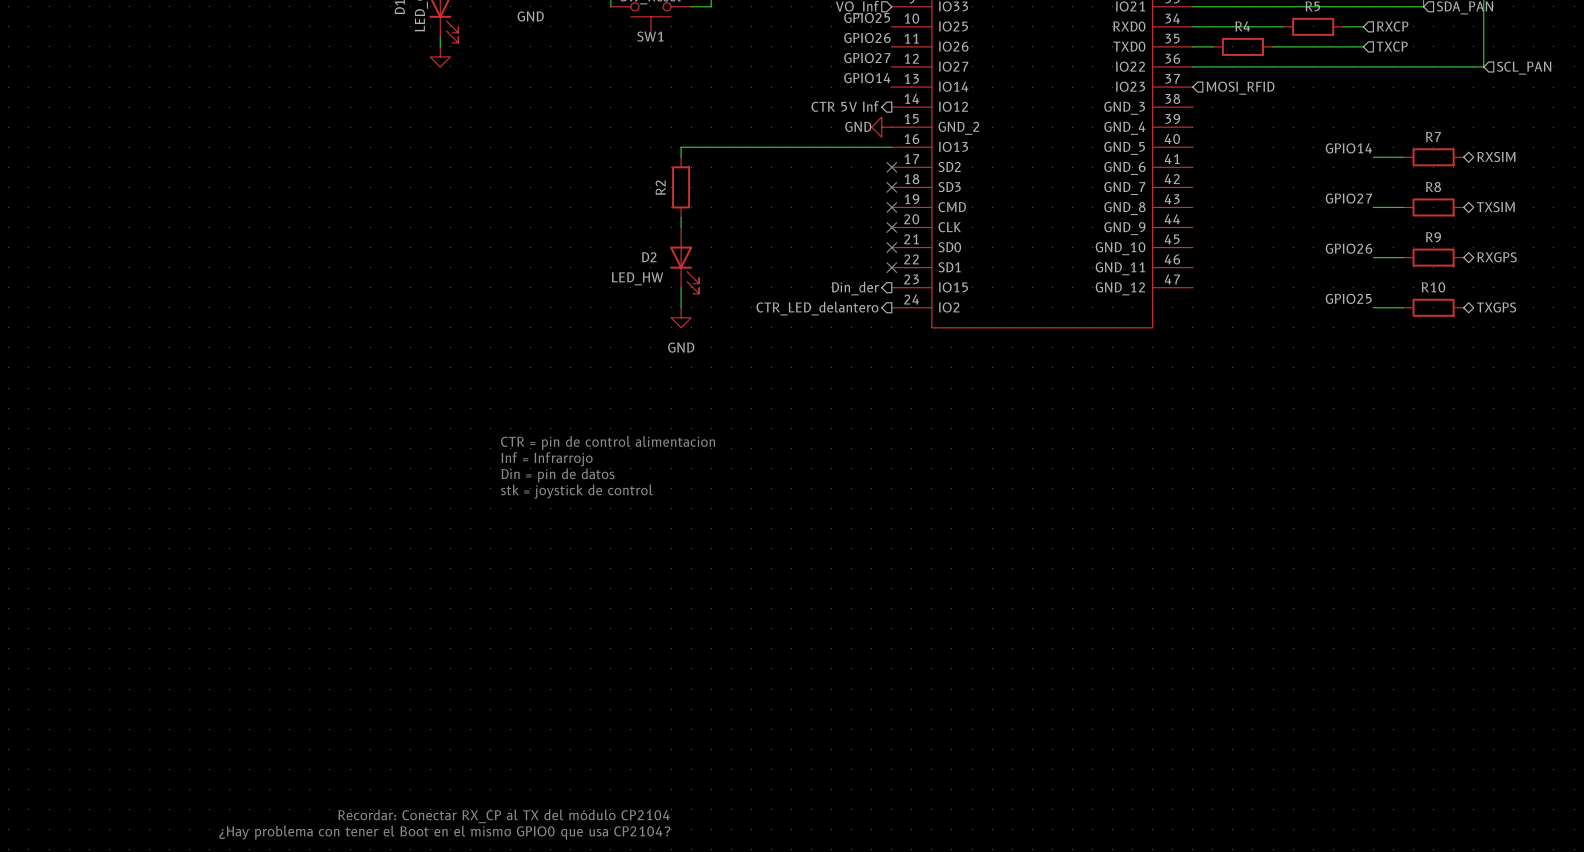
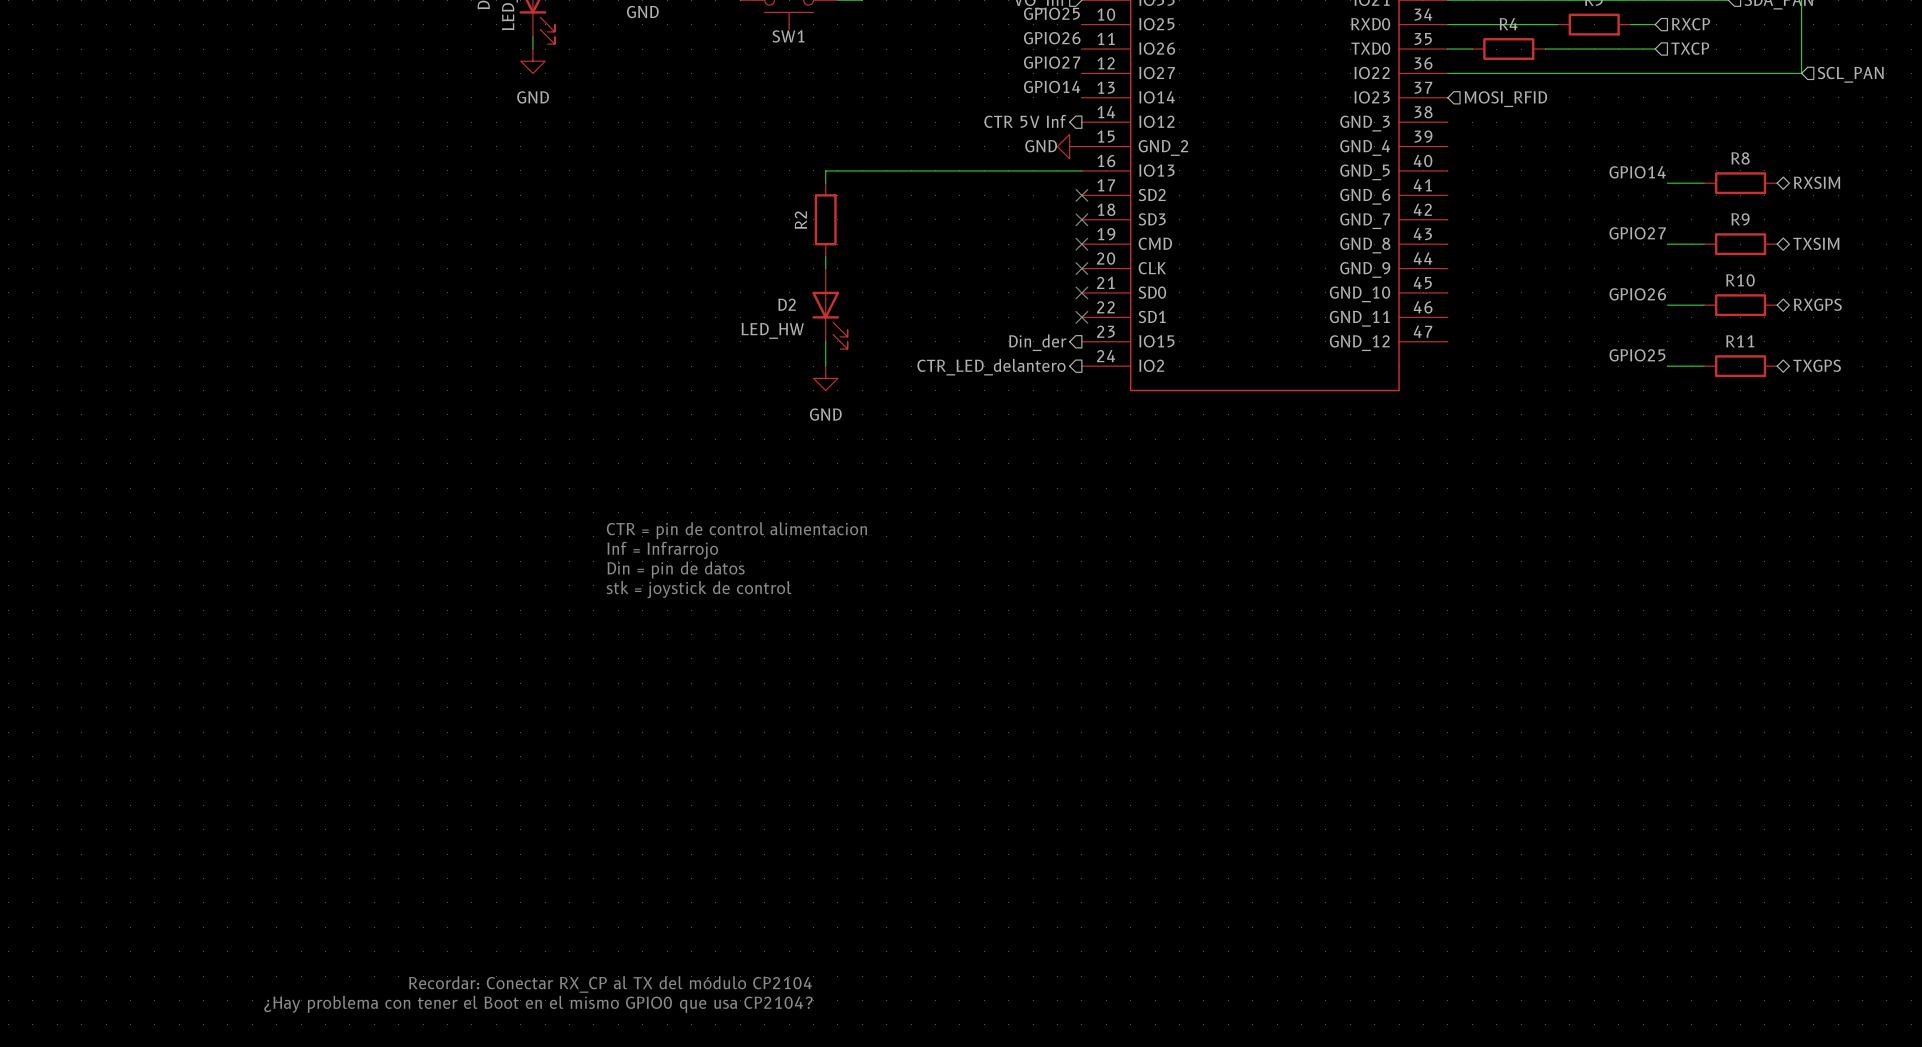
power symbol text: none -> GND (533, 97)
R7 name: R7 (1433, 136) -> R8 (1740, 158)
R8 name: R8 (1433, 187) -> R9 (1740, 219)
R9 name: R9 (1433, 237) -> R10 (1740, 280)
R10 name: R10 (1433, 287) -> R11 (1740, 341)

